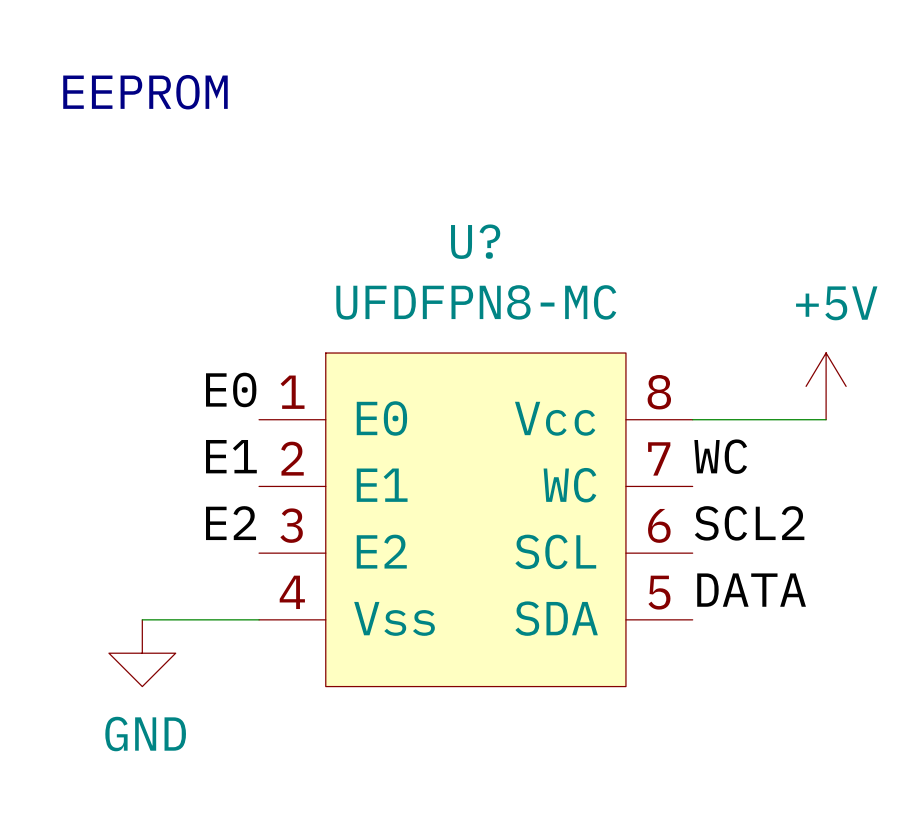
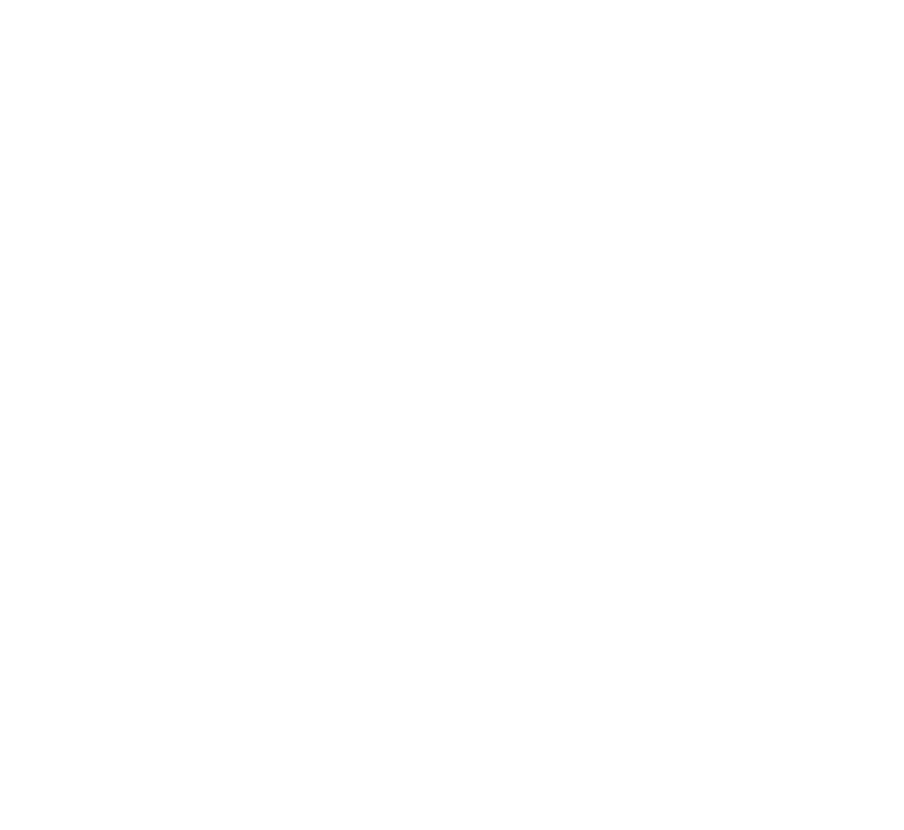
text: EEPROM (145, 92) -> none
power symbol: +5V (826, 386) -> none
label: E0 (231, 389) -> none
wire: (692, 419) (826, 419) -> none
label: E1 (231, 456) -> none
label: WC (720, 456) -> none
U?: UFDFPN8-MC (475, 519) -> none
label: E2 (231, 523) -> none
label: SCL2 (749, 523) -> none
label: DATA (751, 590) -> none
wire: (142, 619) (259, 619) -> none
power symbol: GND (142, 653) -> none

